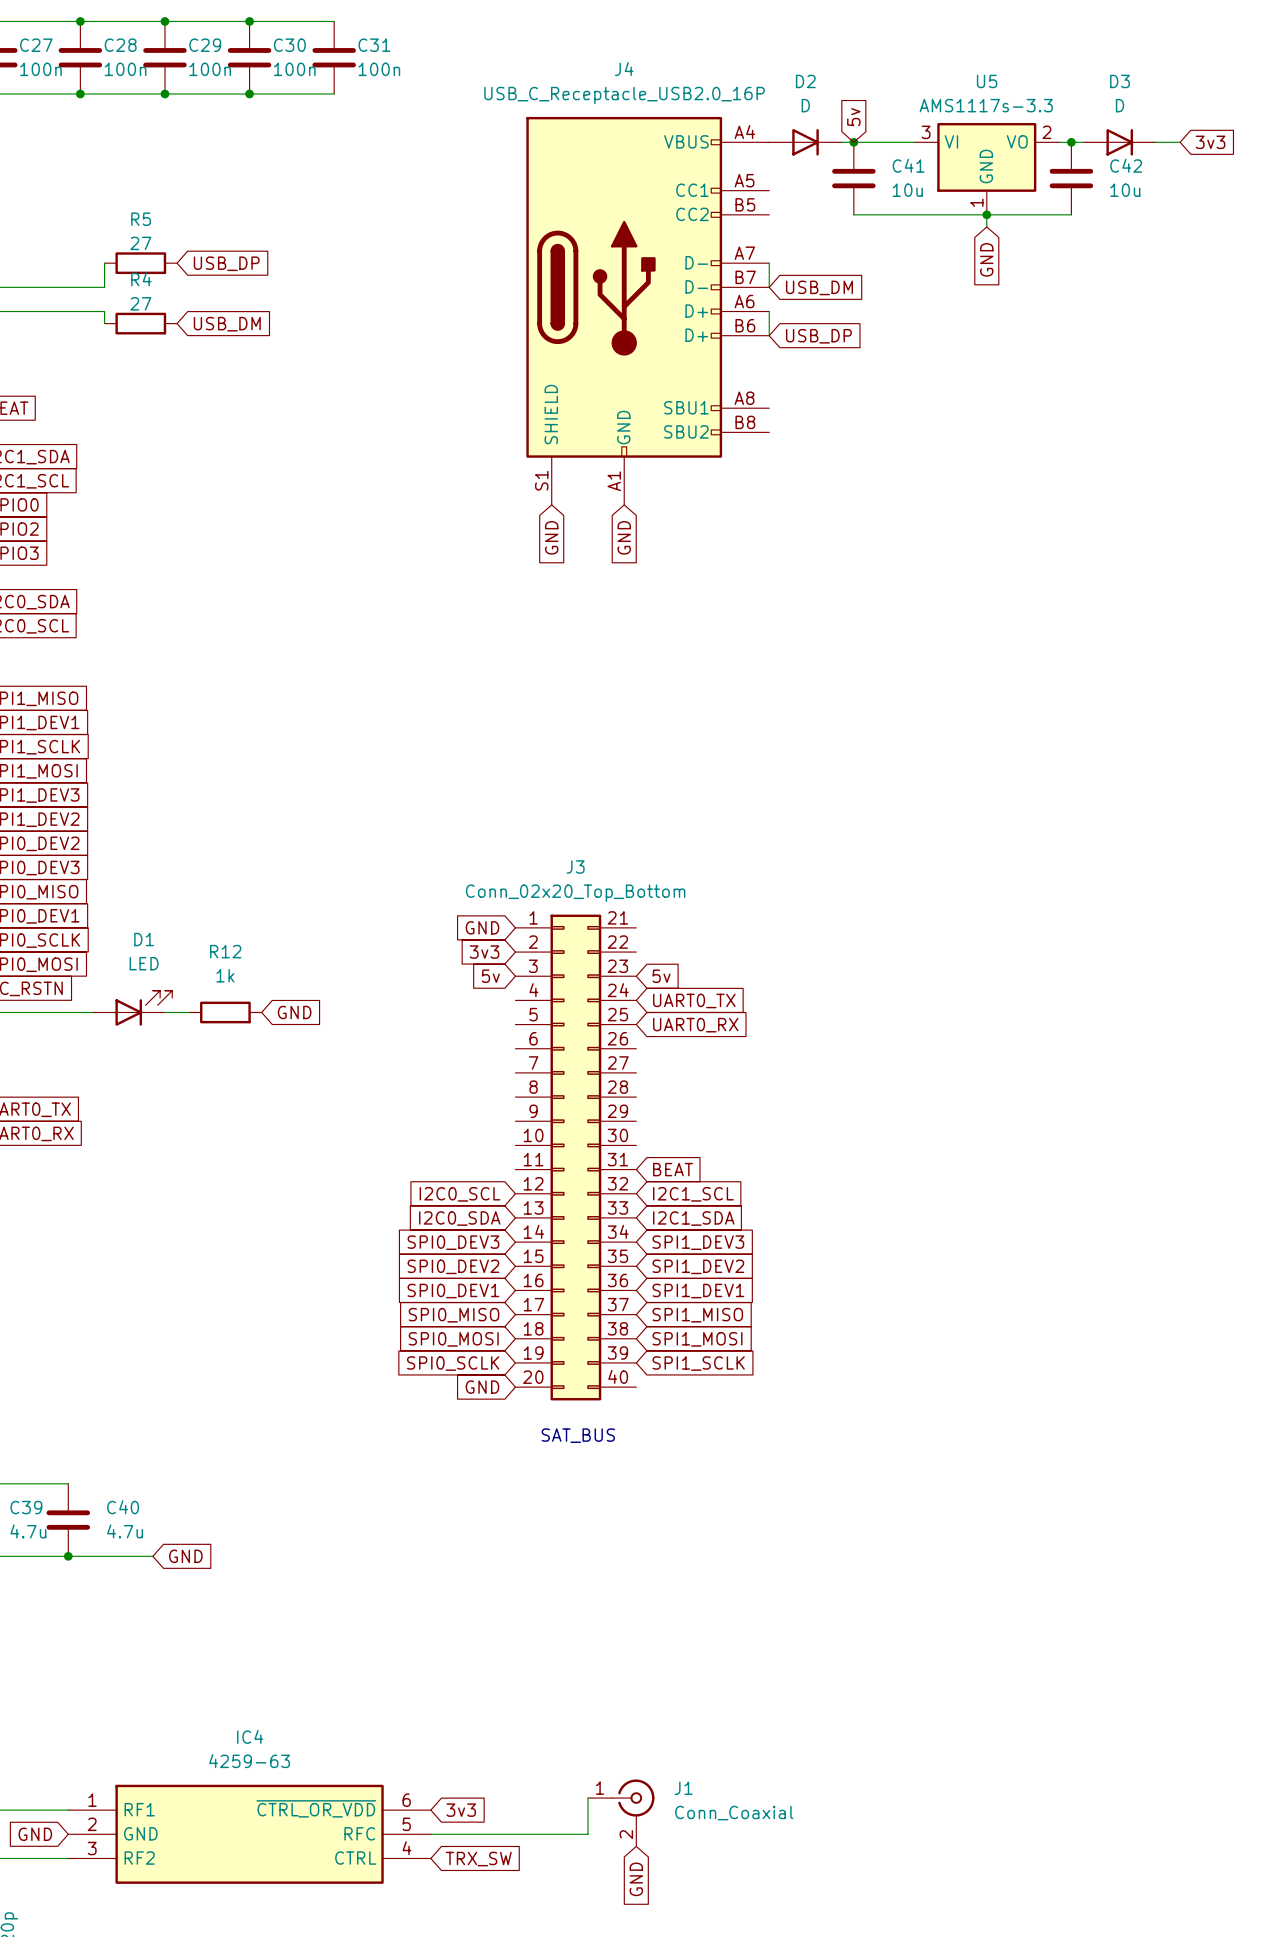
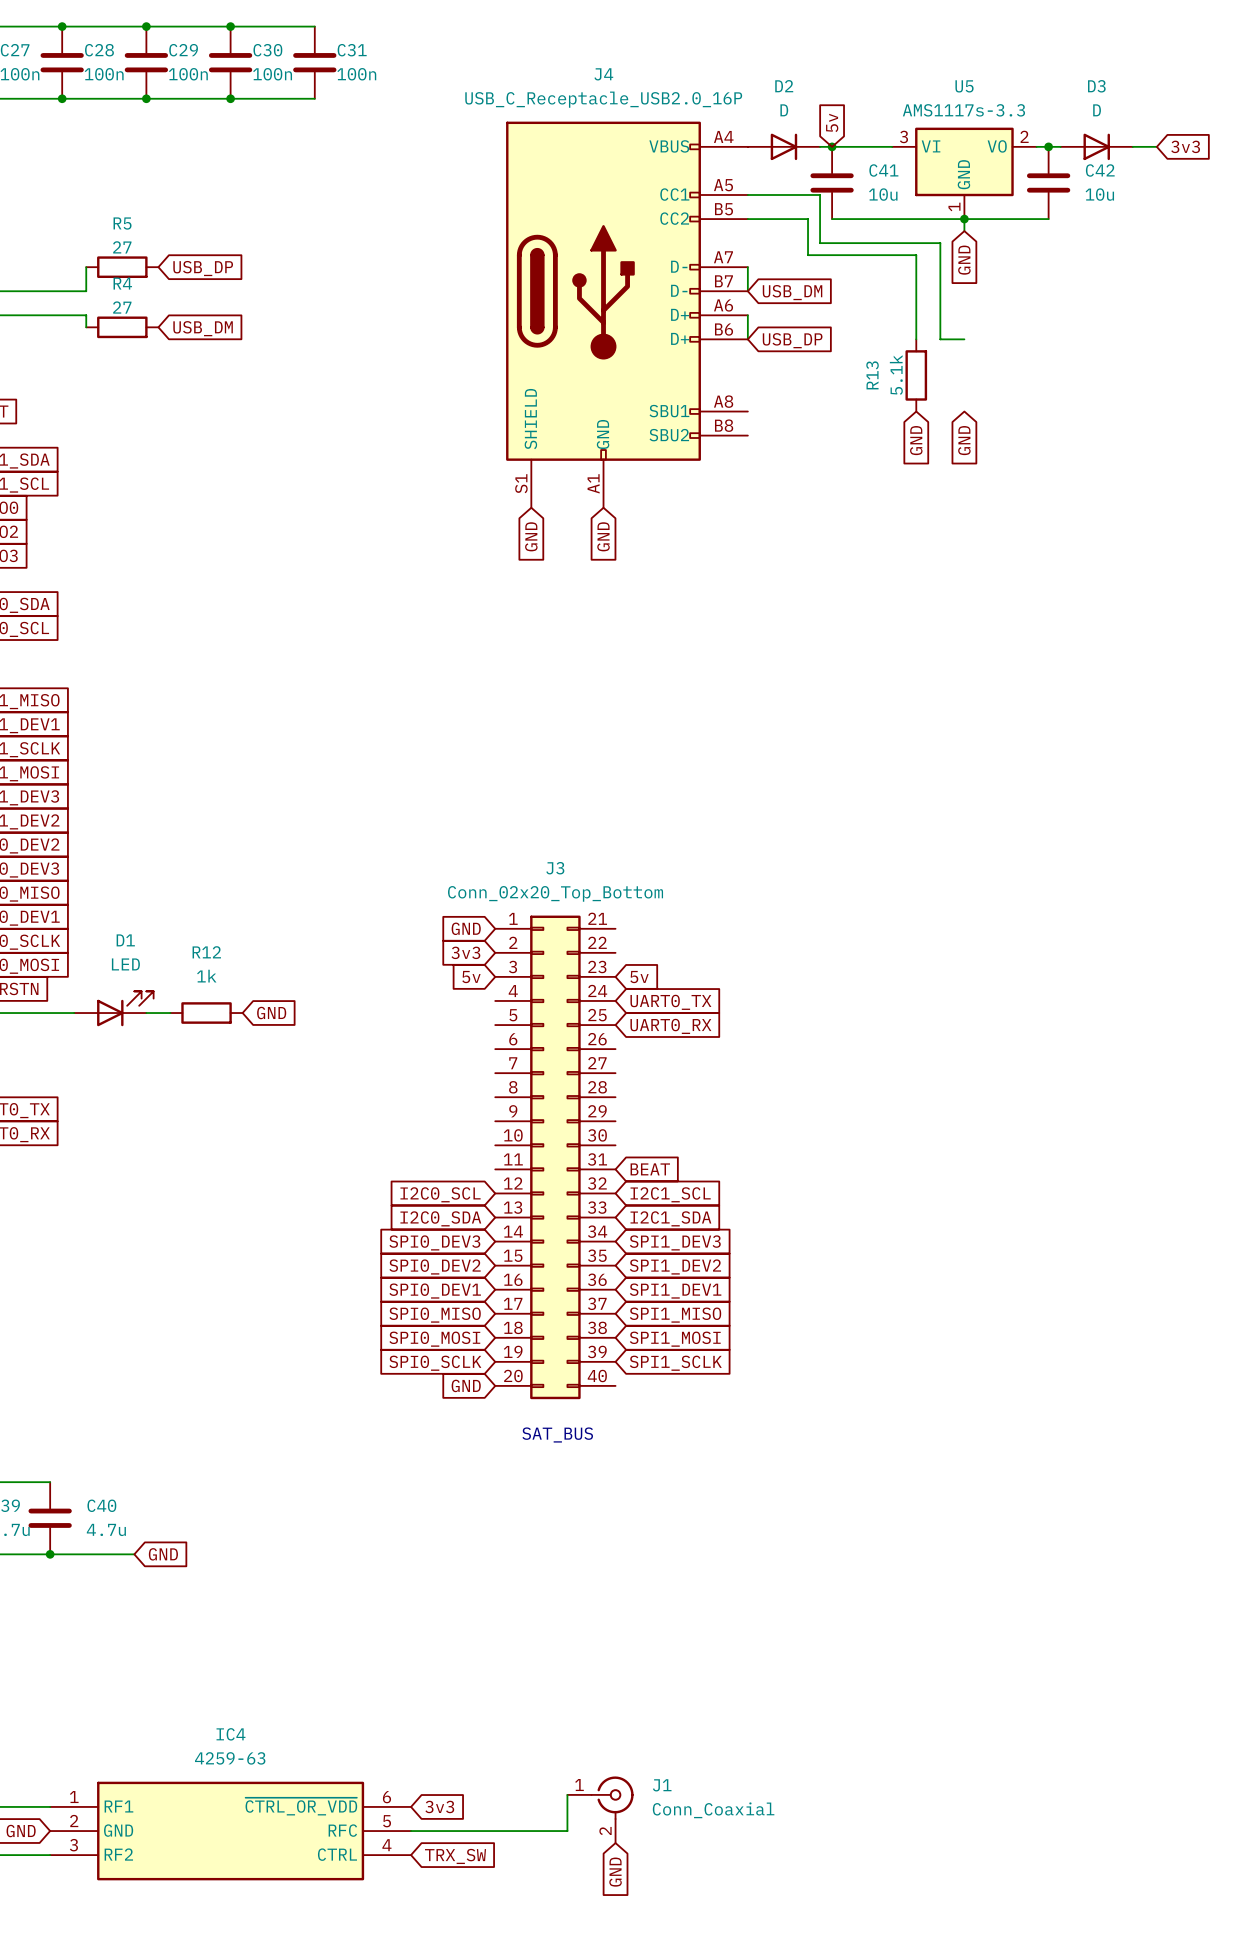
wire: none -> (747, 195) (820, 195) (820, 243) (940, 243) (940, 339) (964, 339)
wire: none -> (747, 219) (808, 219) (808, 255) (916, 255) (916, 339)
R13: none -> 5.1k (916, 375)
global label: none -> GND (916, 440)
global label: none -> GND (964, 440)

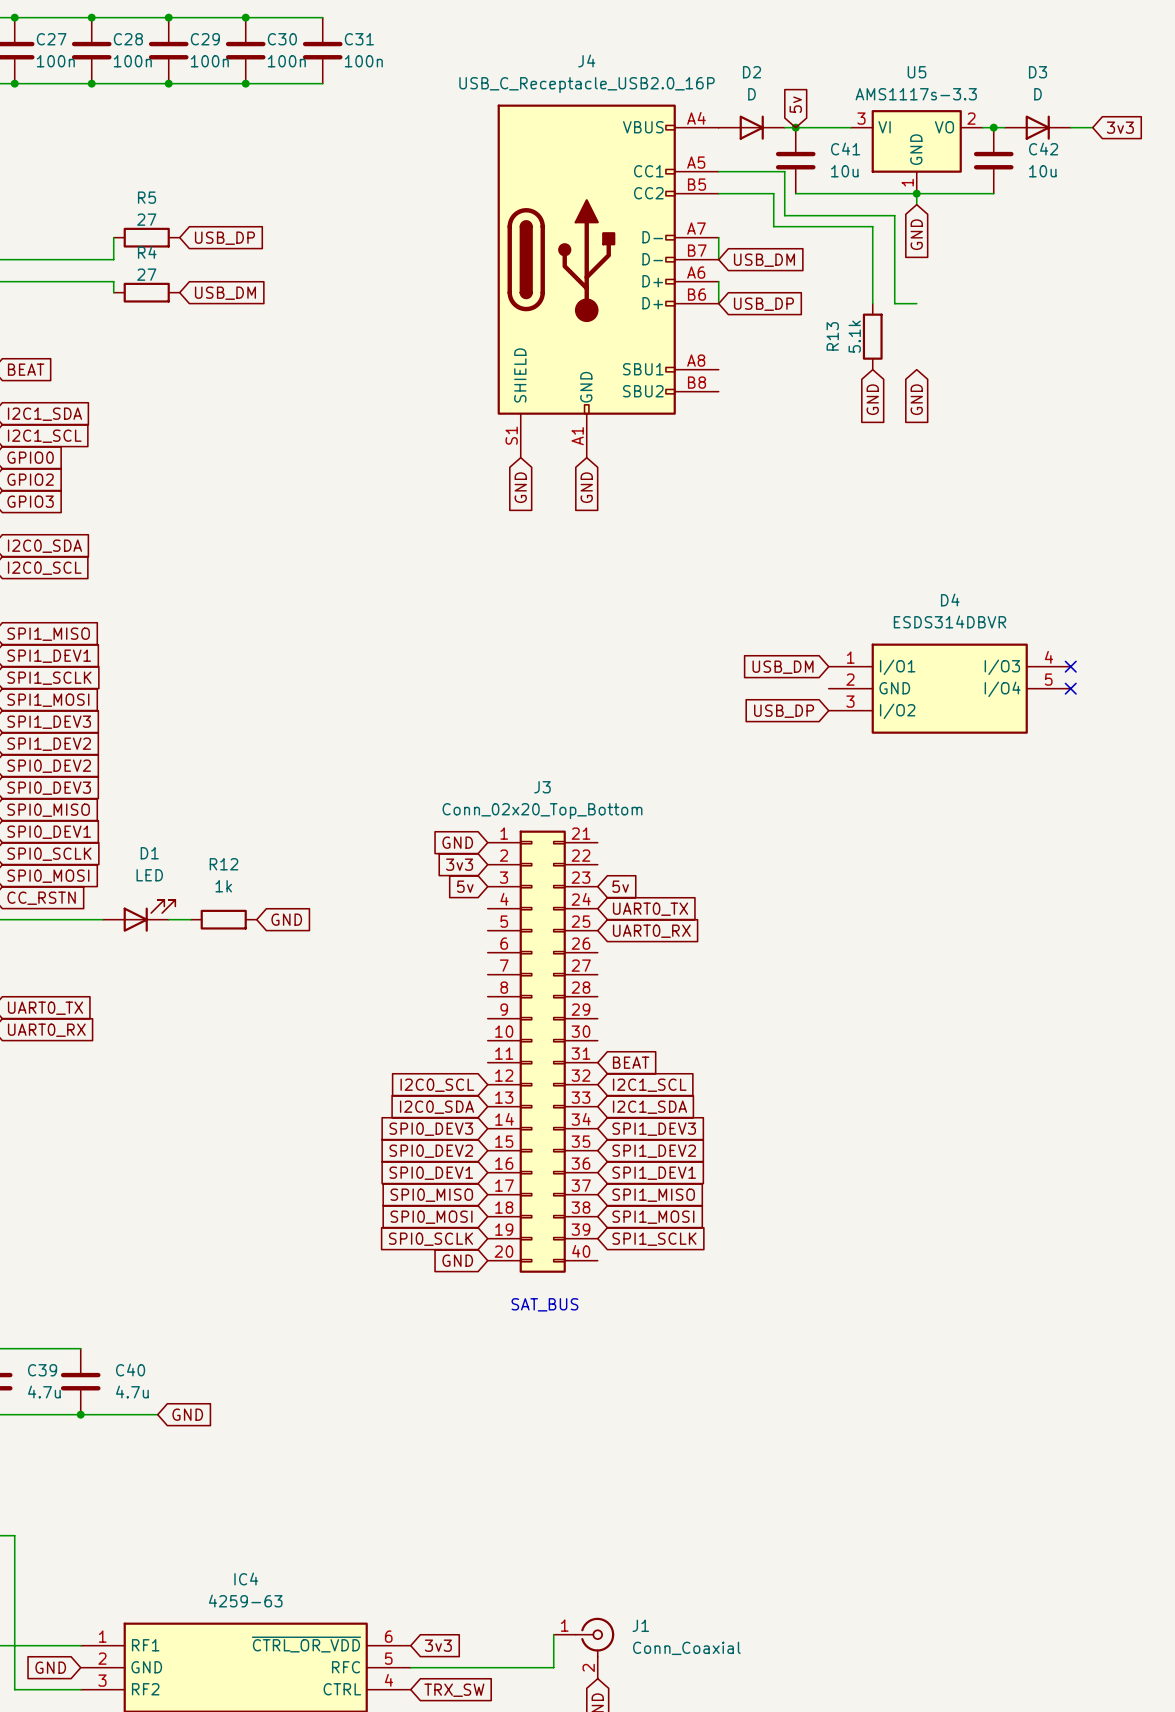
no-connect mark: none -> (1070, 666)
global label: none -> USB_DM (783, 667)
D4: none -> ESDS314DBVR (949, 688)
no-connect mark: none -> (1070, 688)
global label: none -> USB_DP (784, 711)

